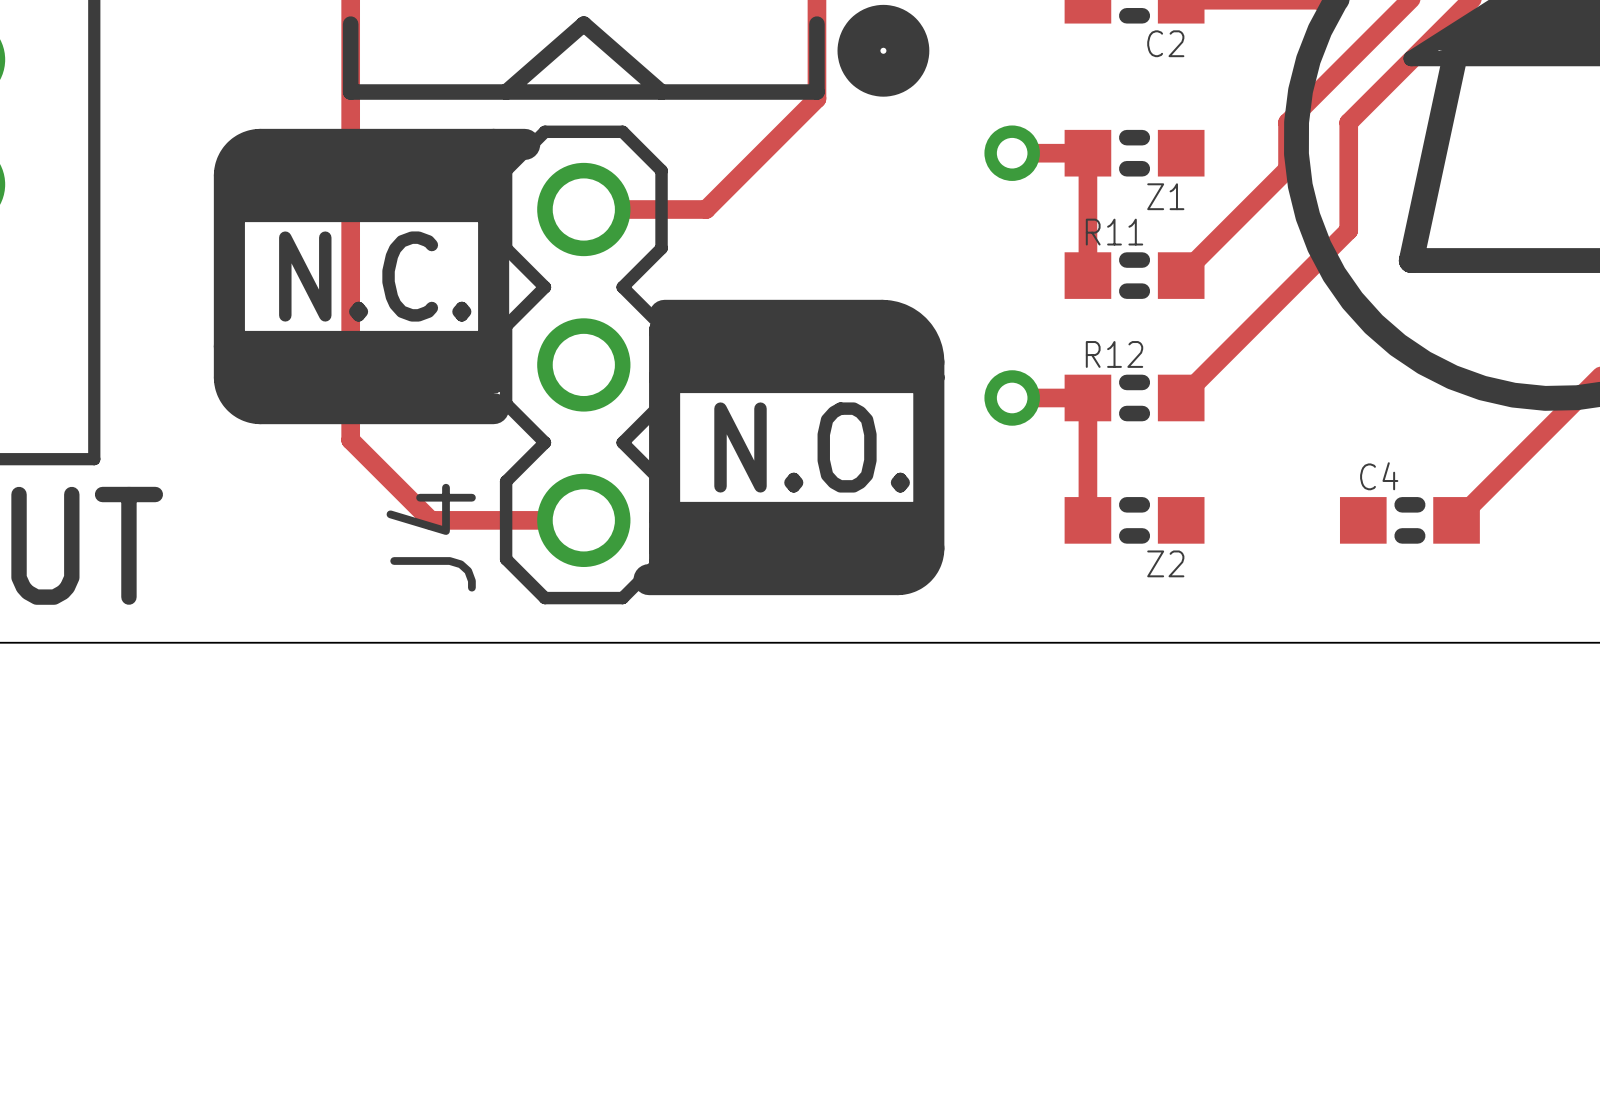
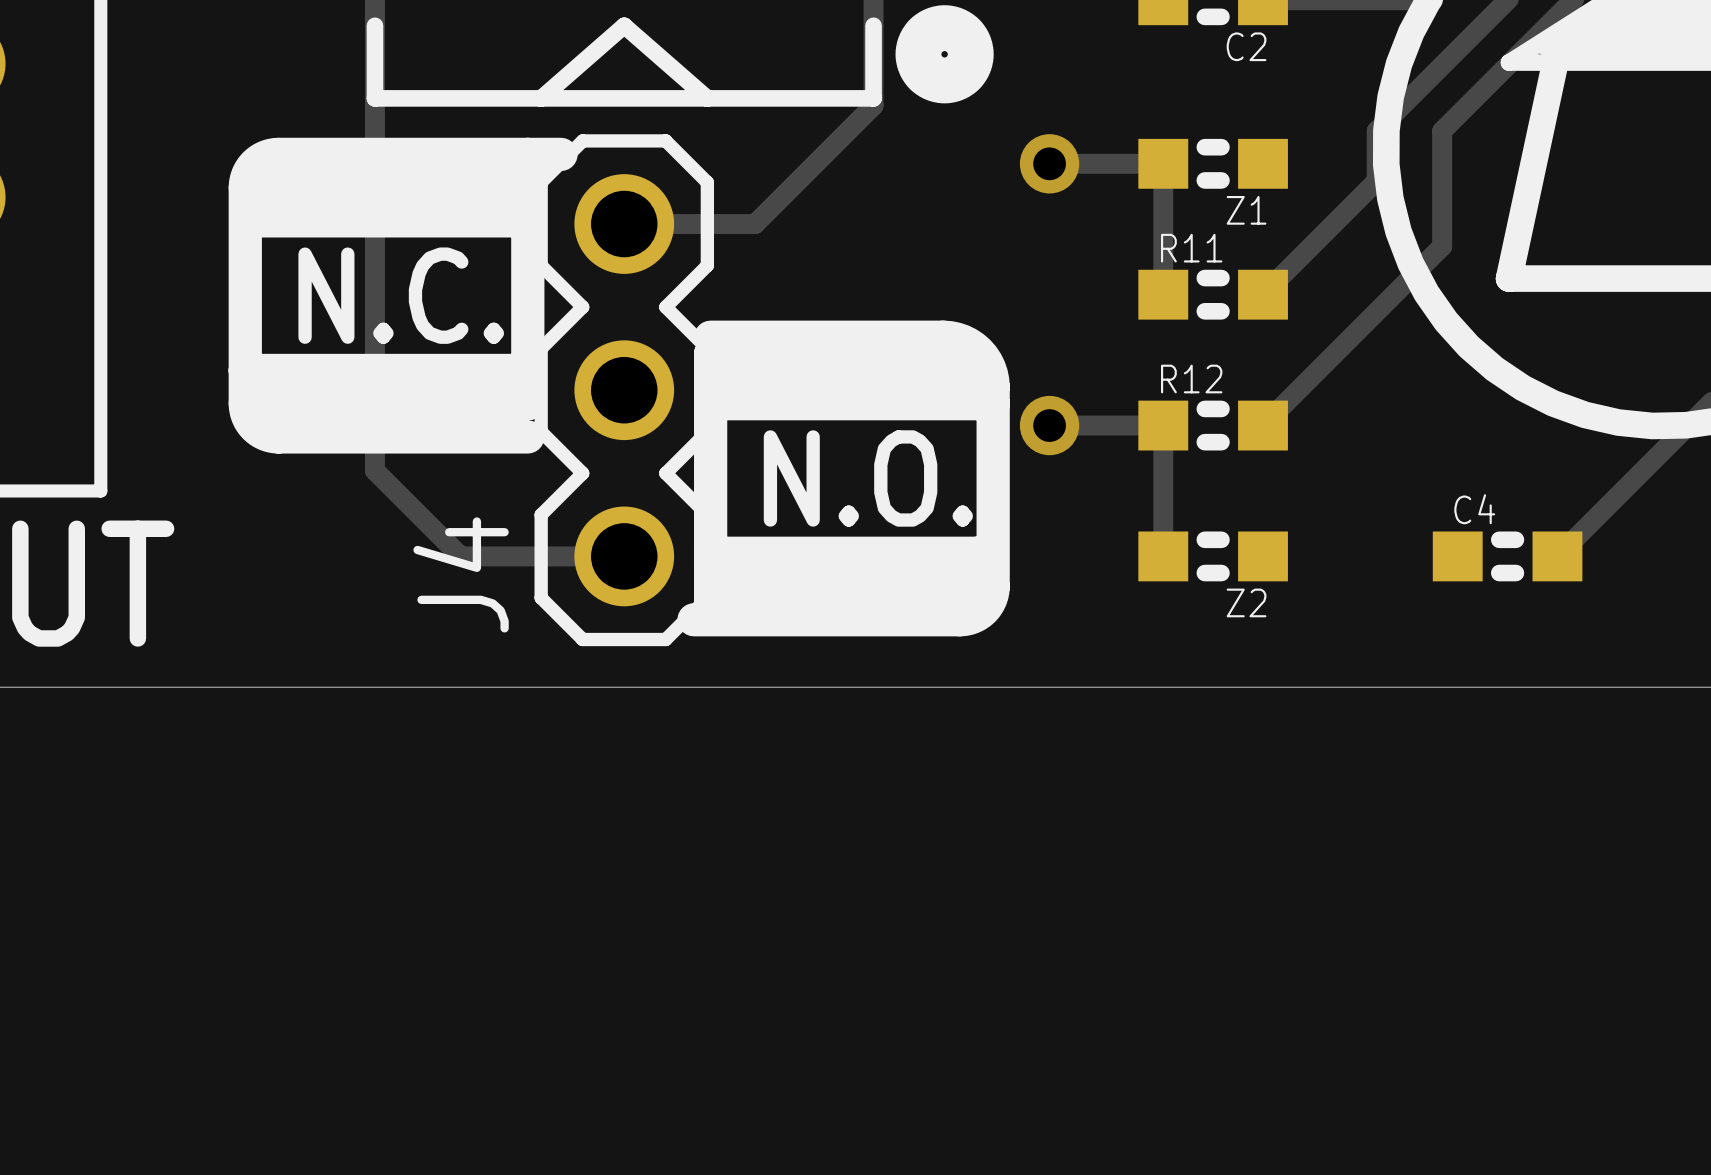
via position: (1012, 153) -> (1049, 163)
via position: (1012, 397) -> (1049, 425)

